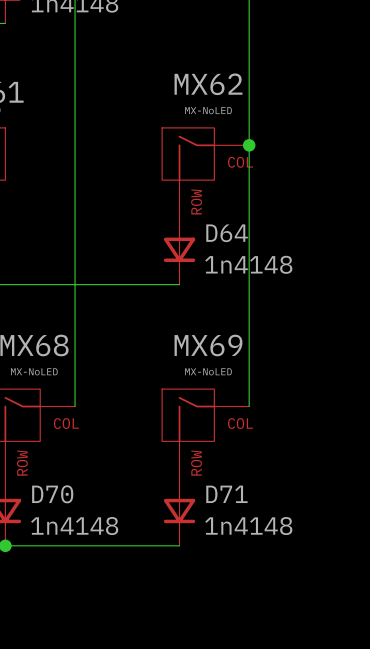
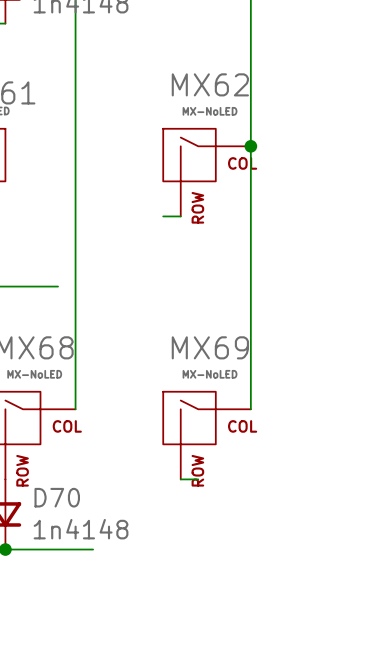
wire: none -> (163, 216) (180, 216)
D64: 1n4148 (179, 249) -> none
wire: (57, 284) (179, 284) -> none
wire: none -> (180, 479) (198, 479)
D71: 1n4148 (179, 511) -> none
wire: (92, 545) (179, 545) -> none

